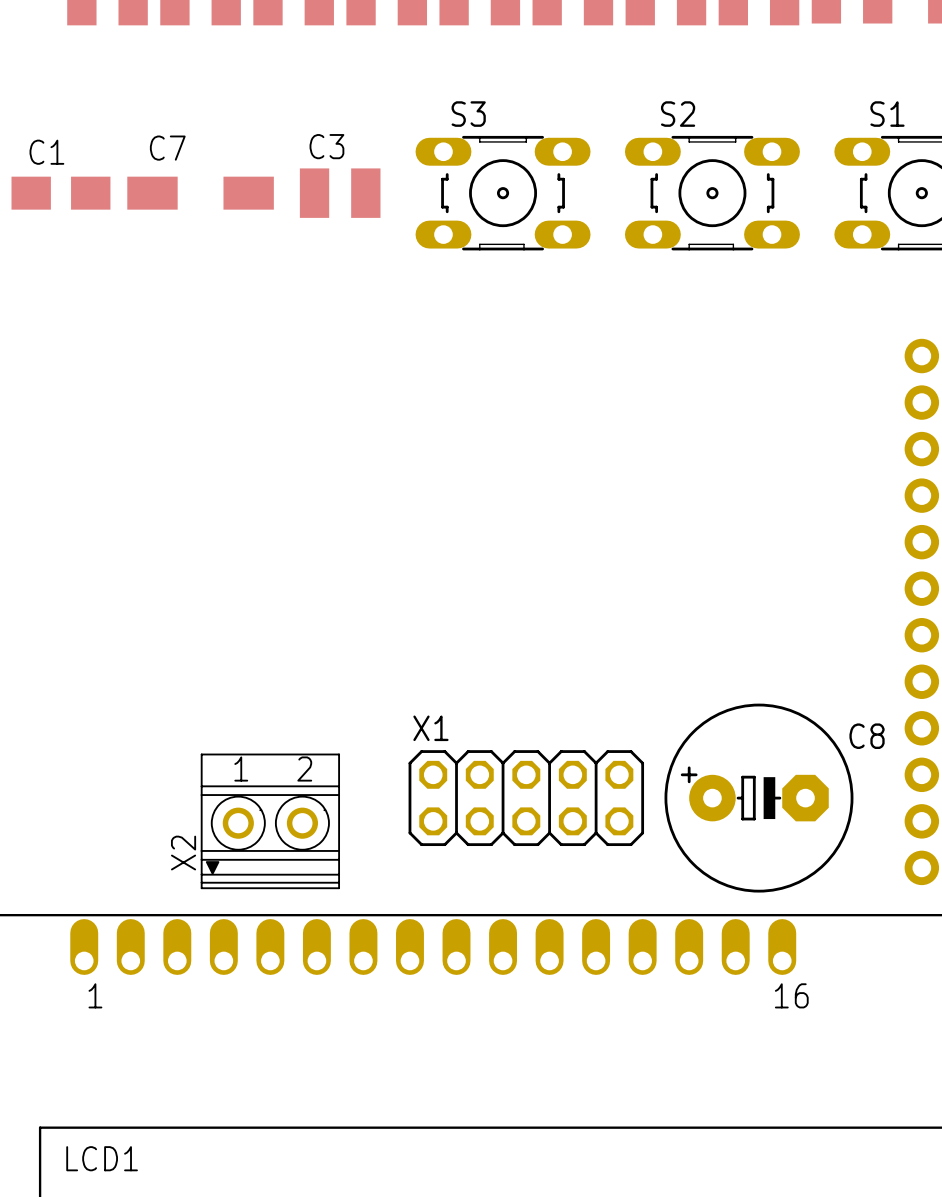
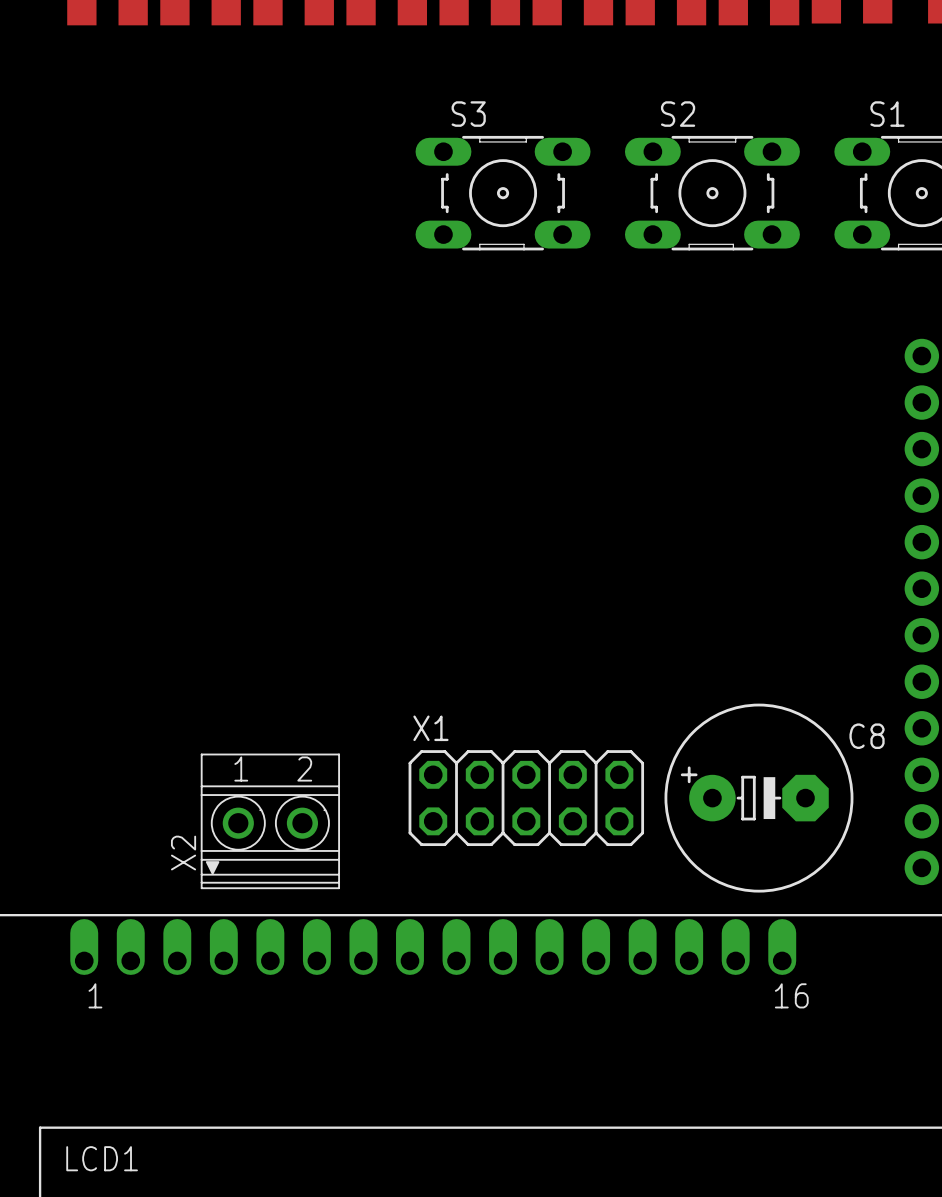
C1: (60, 193) -> none
C7: (200, 193) -> none
C3: (340, 193) -> none

